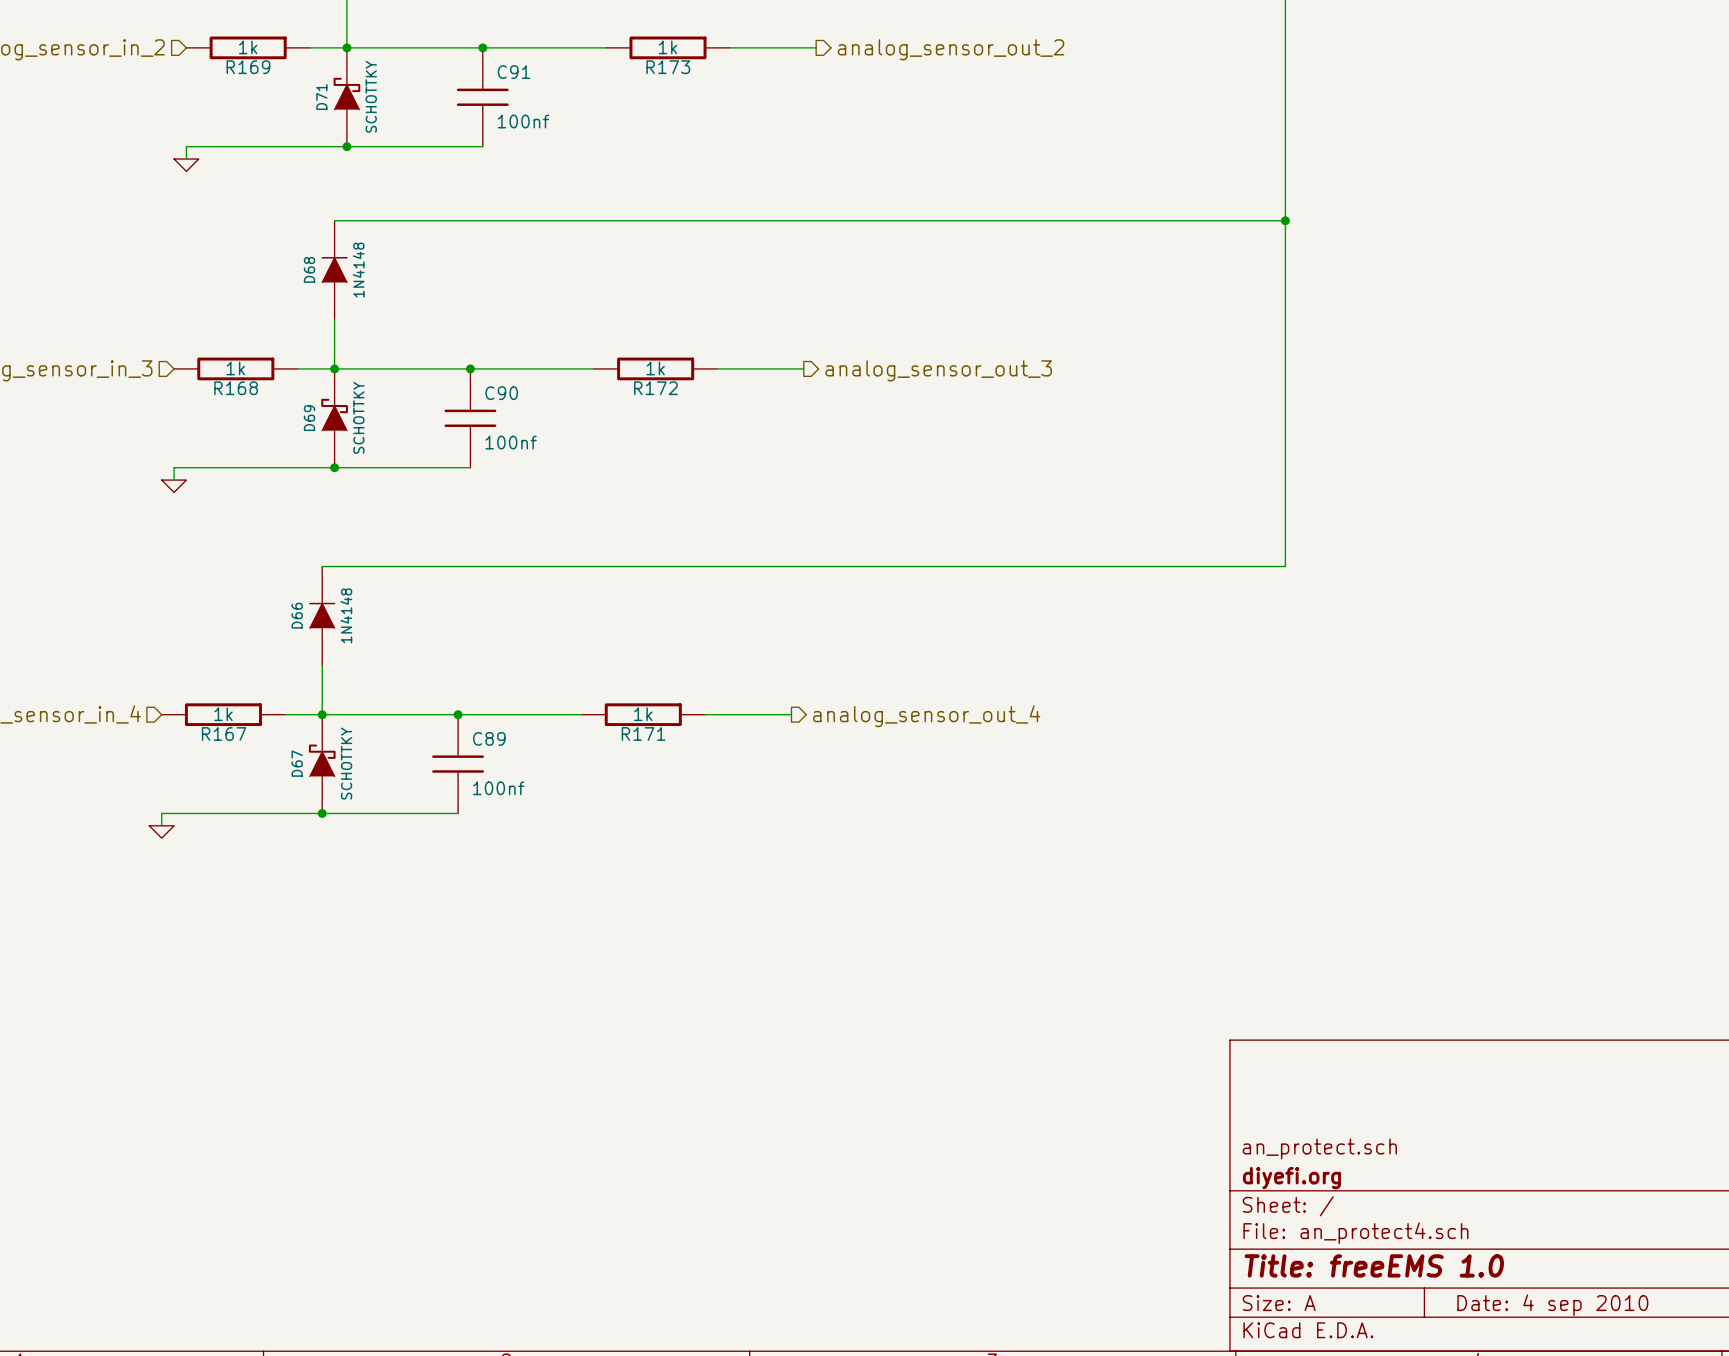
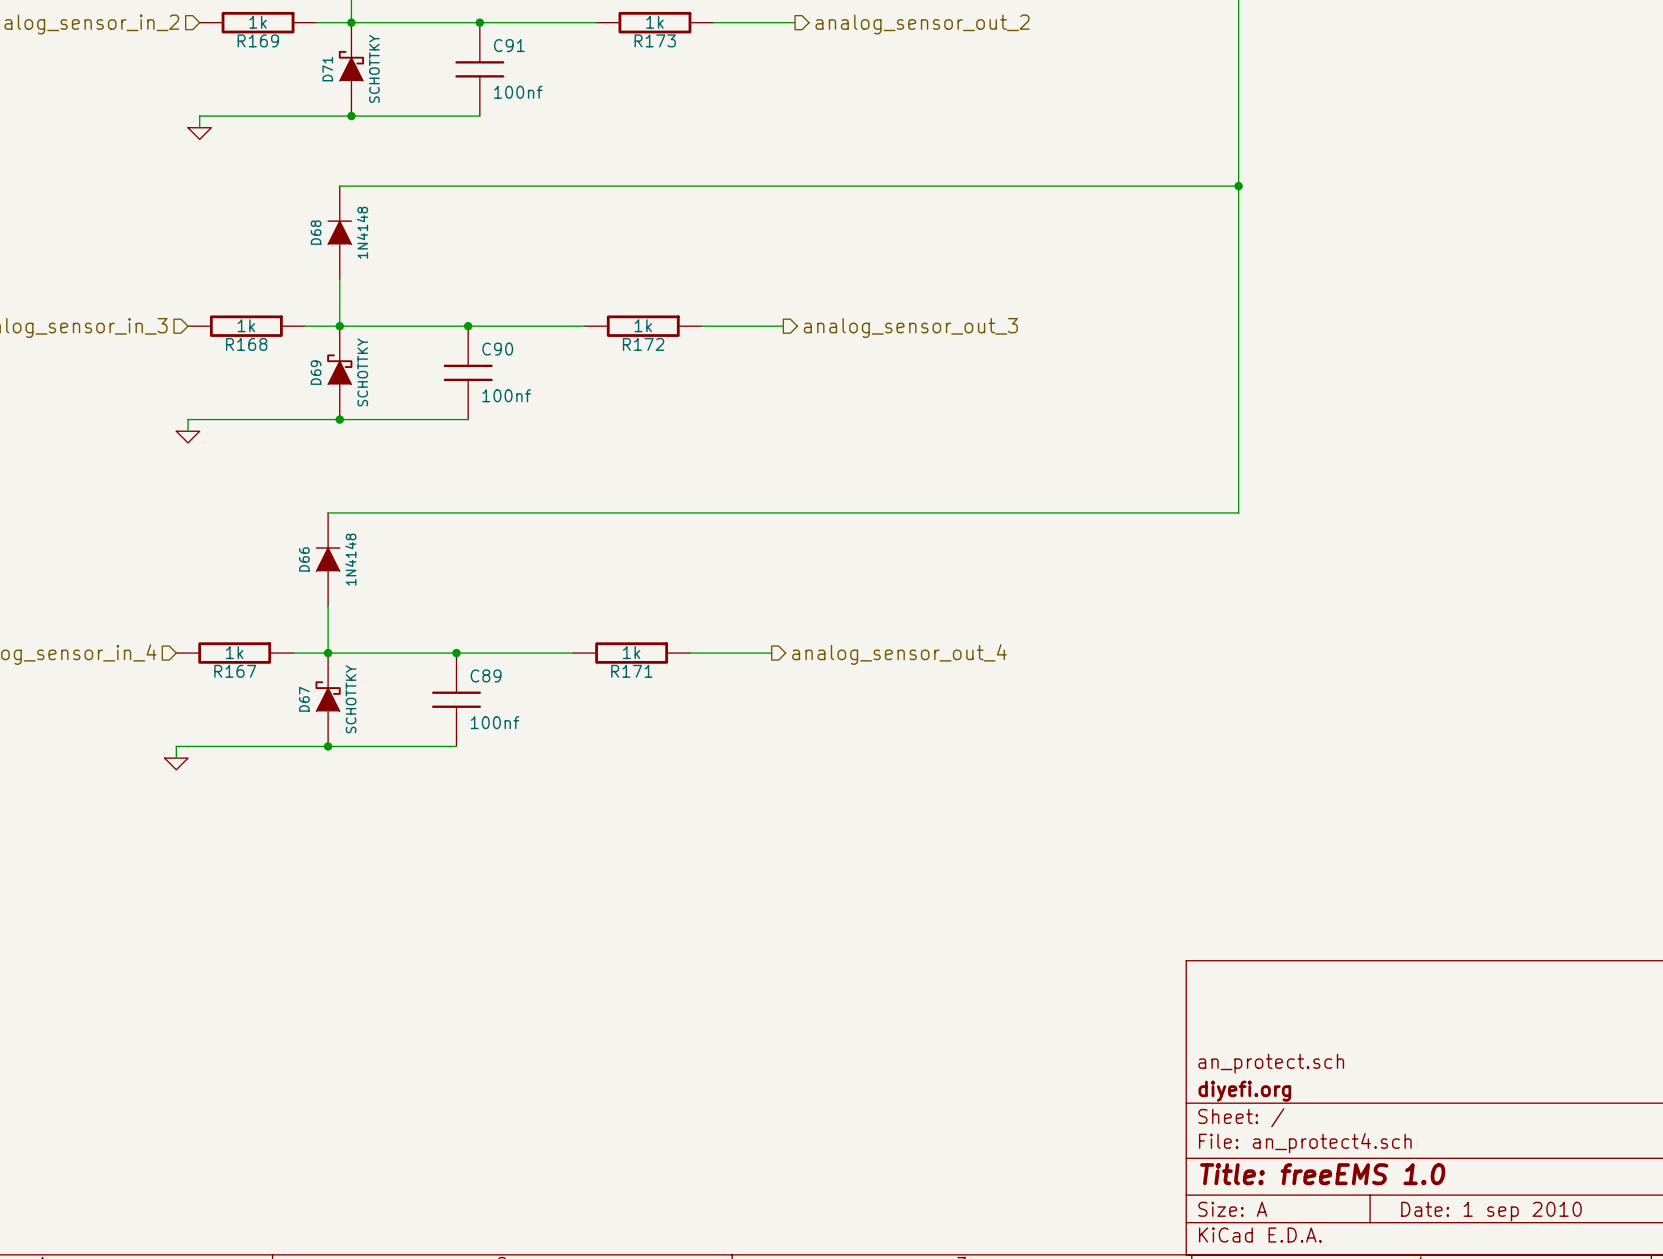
title block: Date: 4 sep 2010 (1552, 1305) -> Date: 1 sep 2010 (1491, 1211)

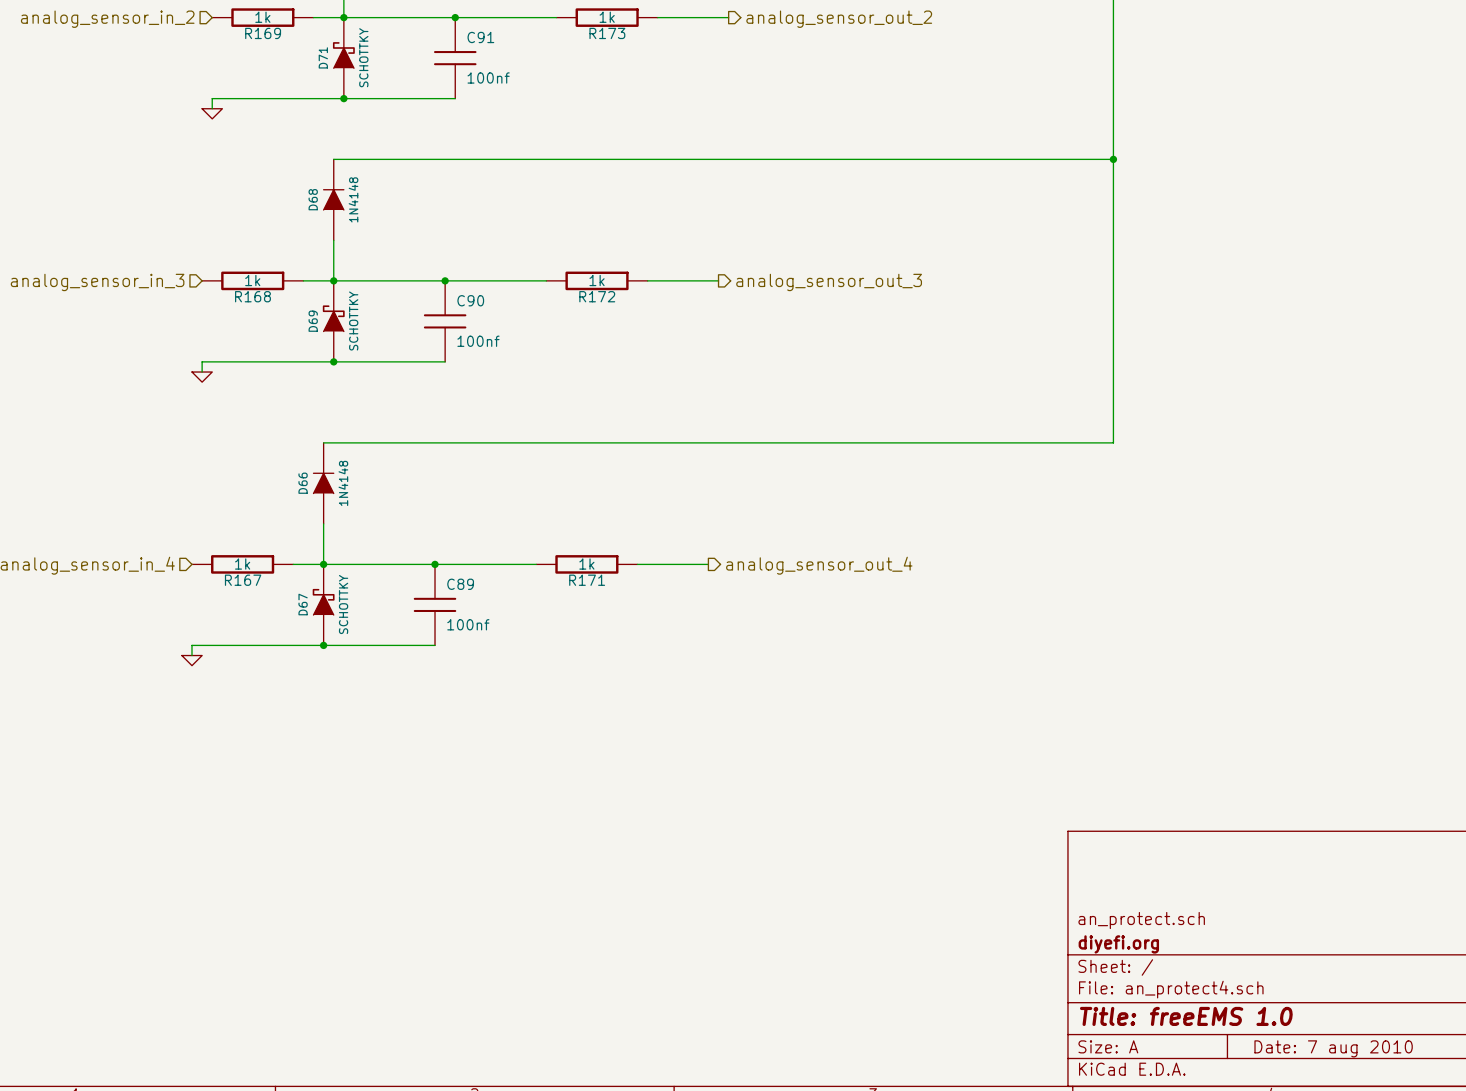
title block: Date: 1 sep 2010 (1491, 1211) -> Date: 7 aug 2010 (1333, 1048)

